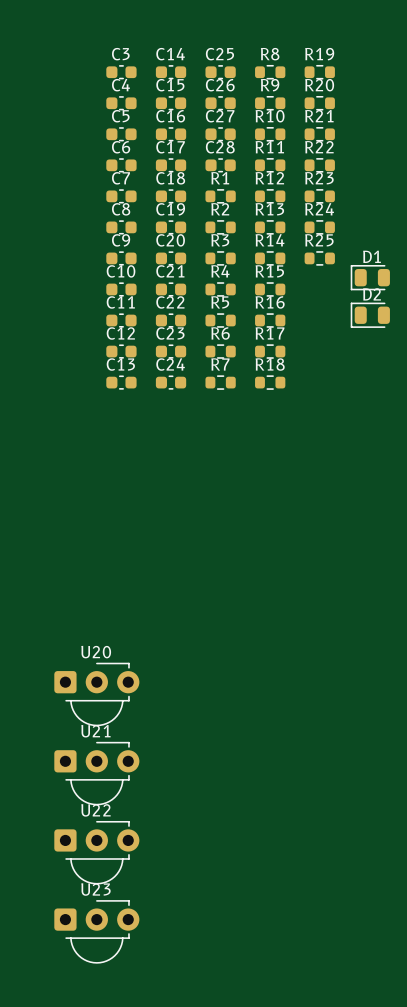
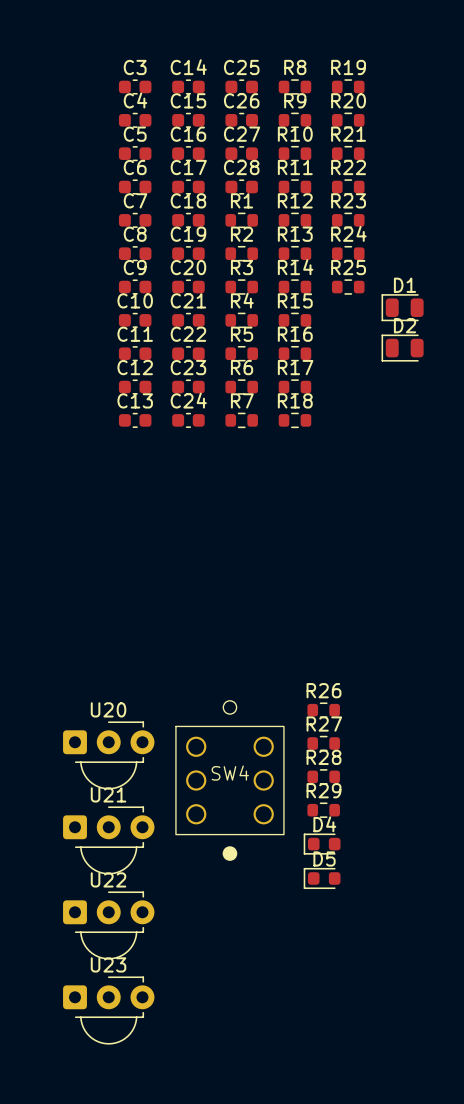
R26: none -> (323, 710)
R27: none -> (323, 743)
R28: none -> (323, 776)
SW4: none -> (229, 780)
R29: none -> (323, 810)
D4: none -> (322, 844)
D5: none -> (322, 878)

